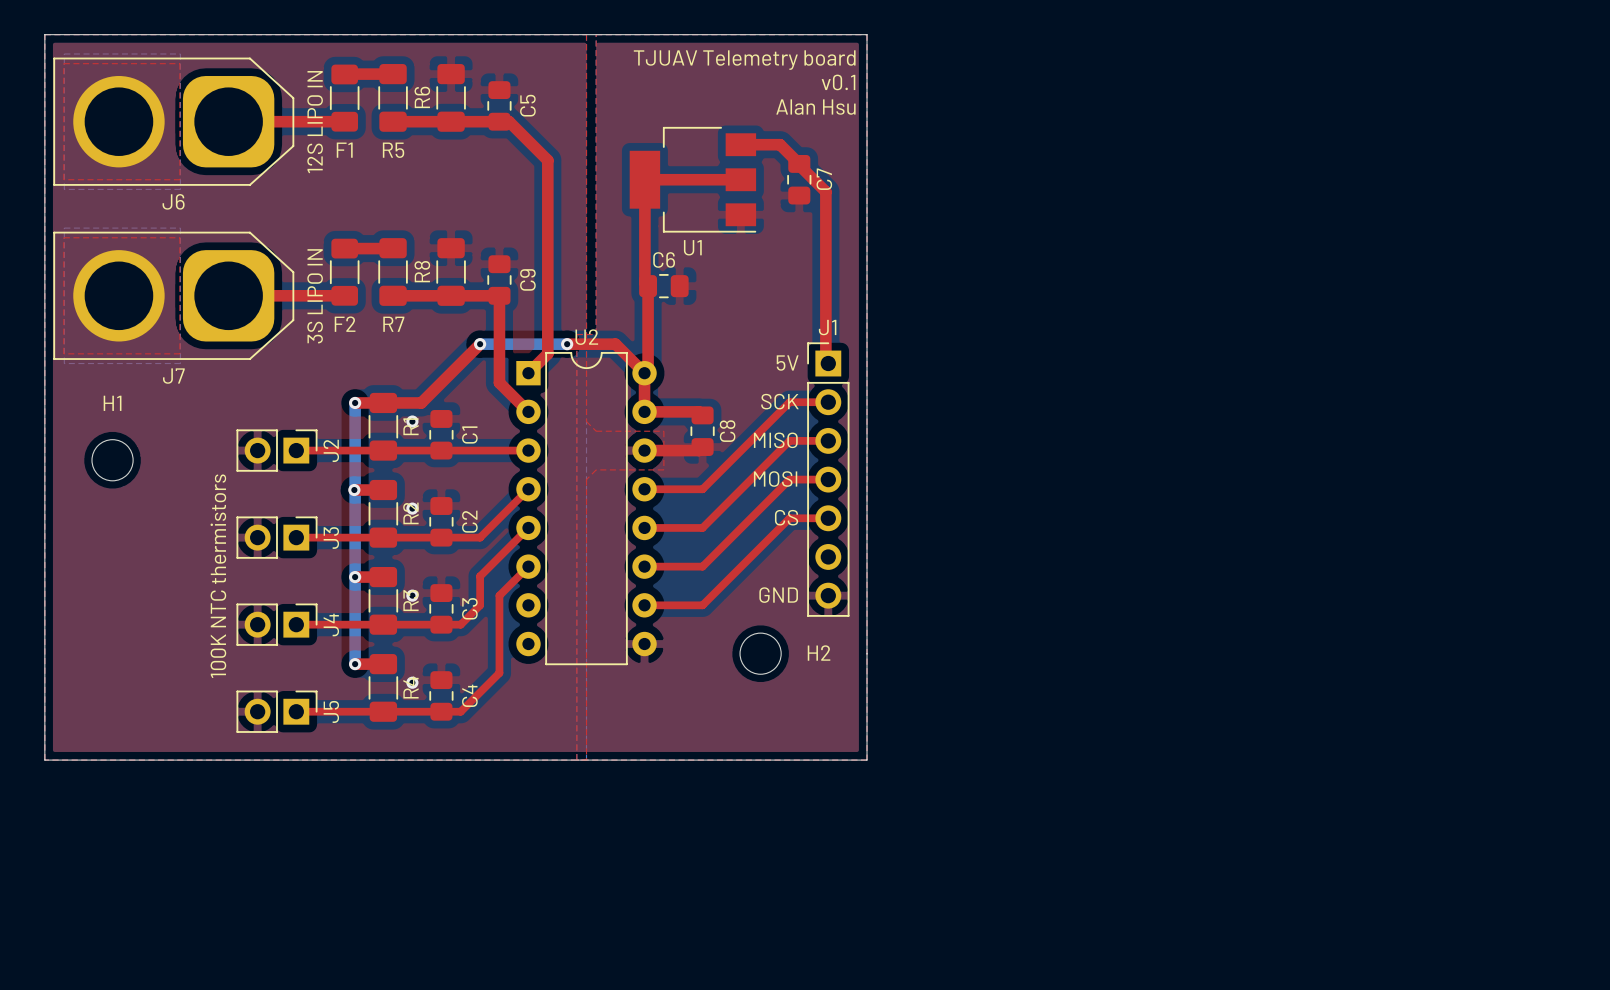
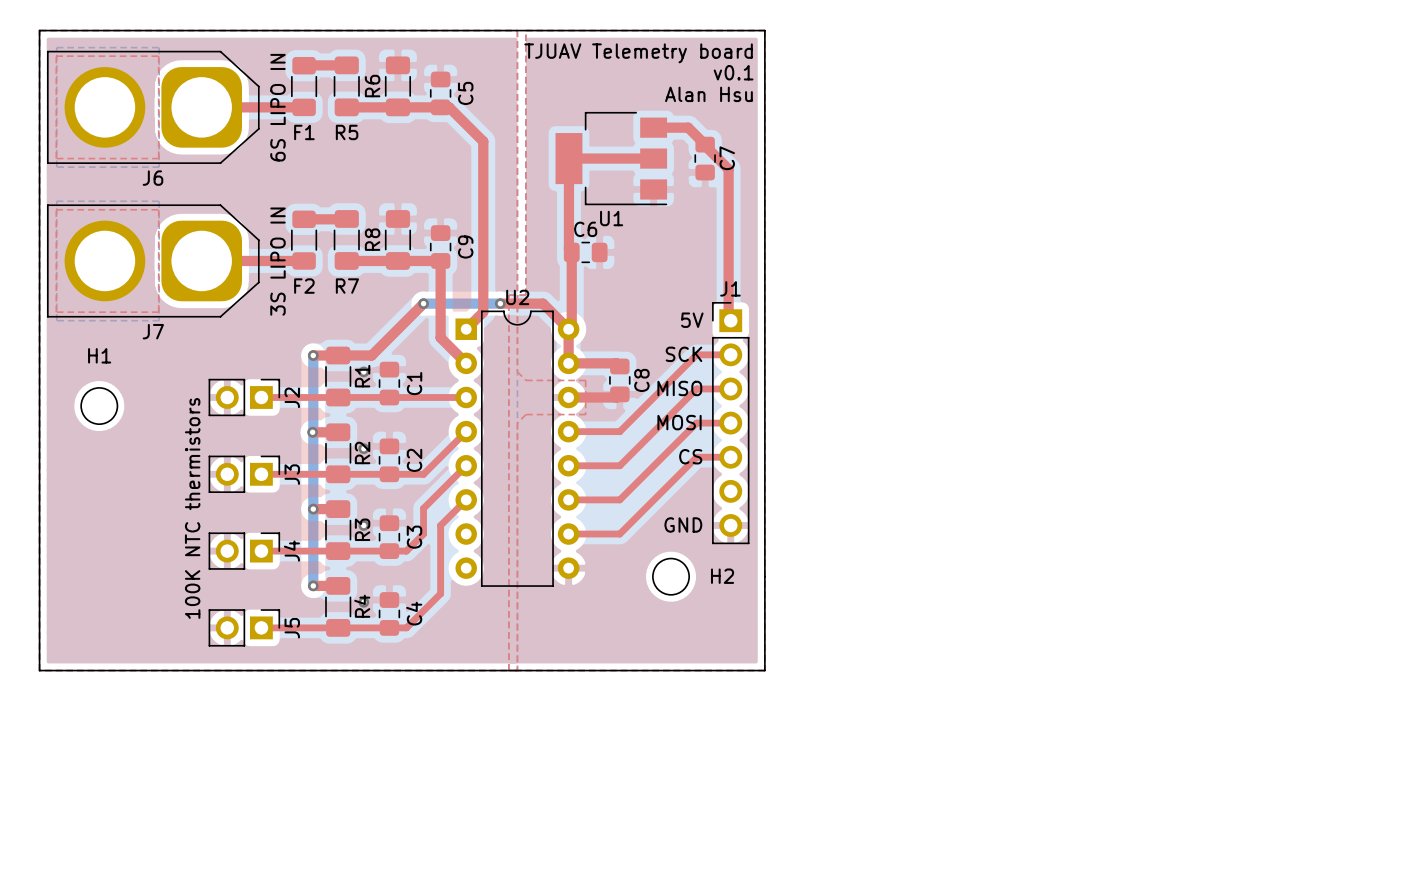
text: 12S LIPO IN (315, 122) -> 6S LIPO IN (277, 107)

